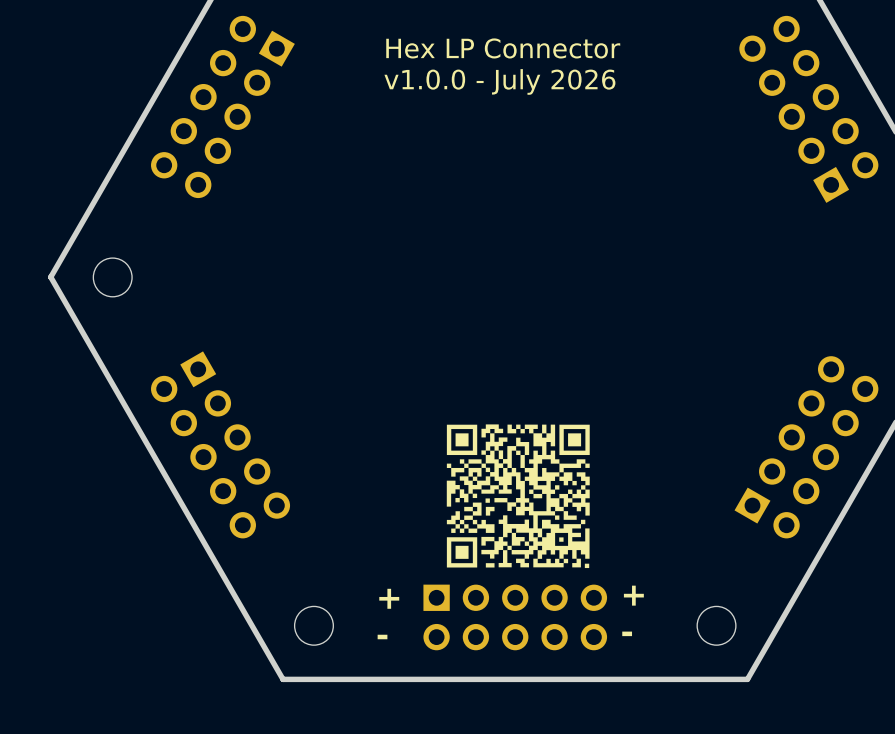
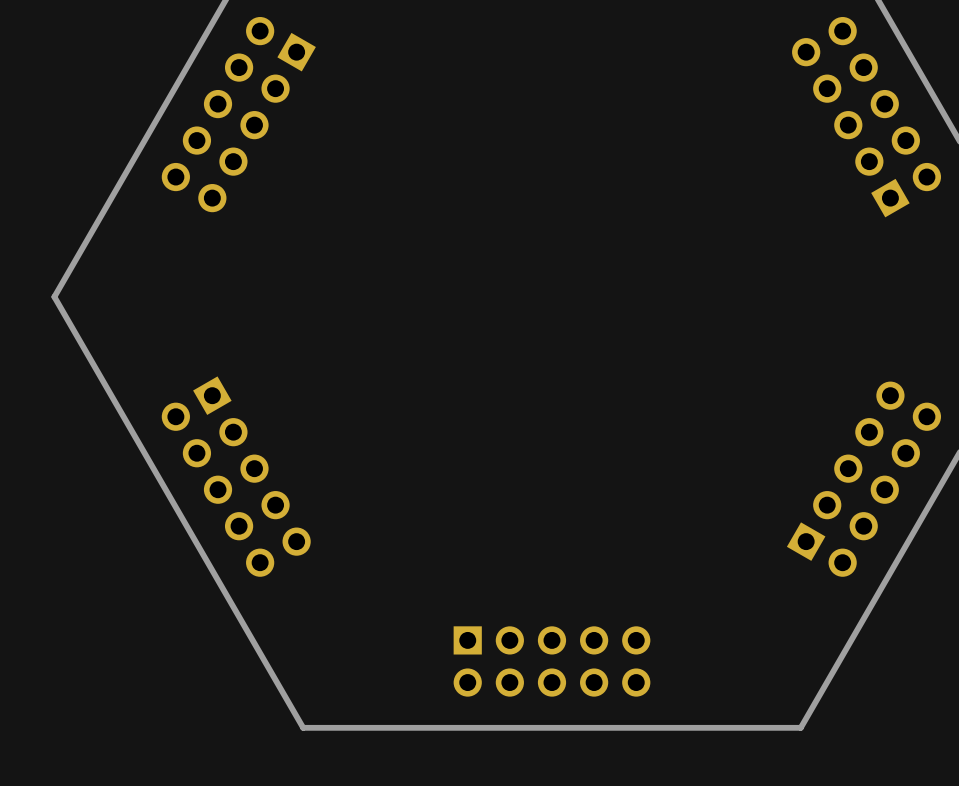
text: Hex LP Connector (503, 48) -> none
text: v1.0.0 - July 2026 (499, 81) -> none
round board edge: [92, 257, 133, 298] -> none
drawing: [446, 424, 590, 569] -> none
text: + (633, 595) -> none
text: + (389, 598) -> none
round board edge: [294, 606, 334, 646] -> none
round board edge: [696, 606, 737, 646] -> none
text: - (627, 633) -> none
text: - (382, 637) -> none

